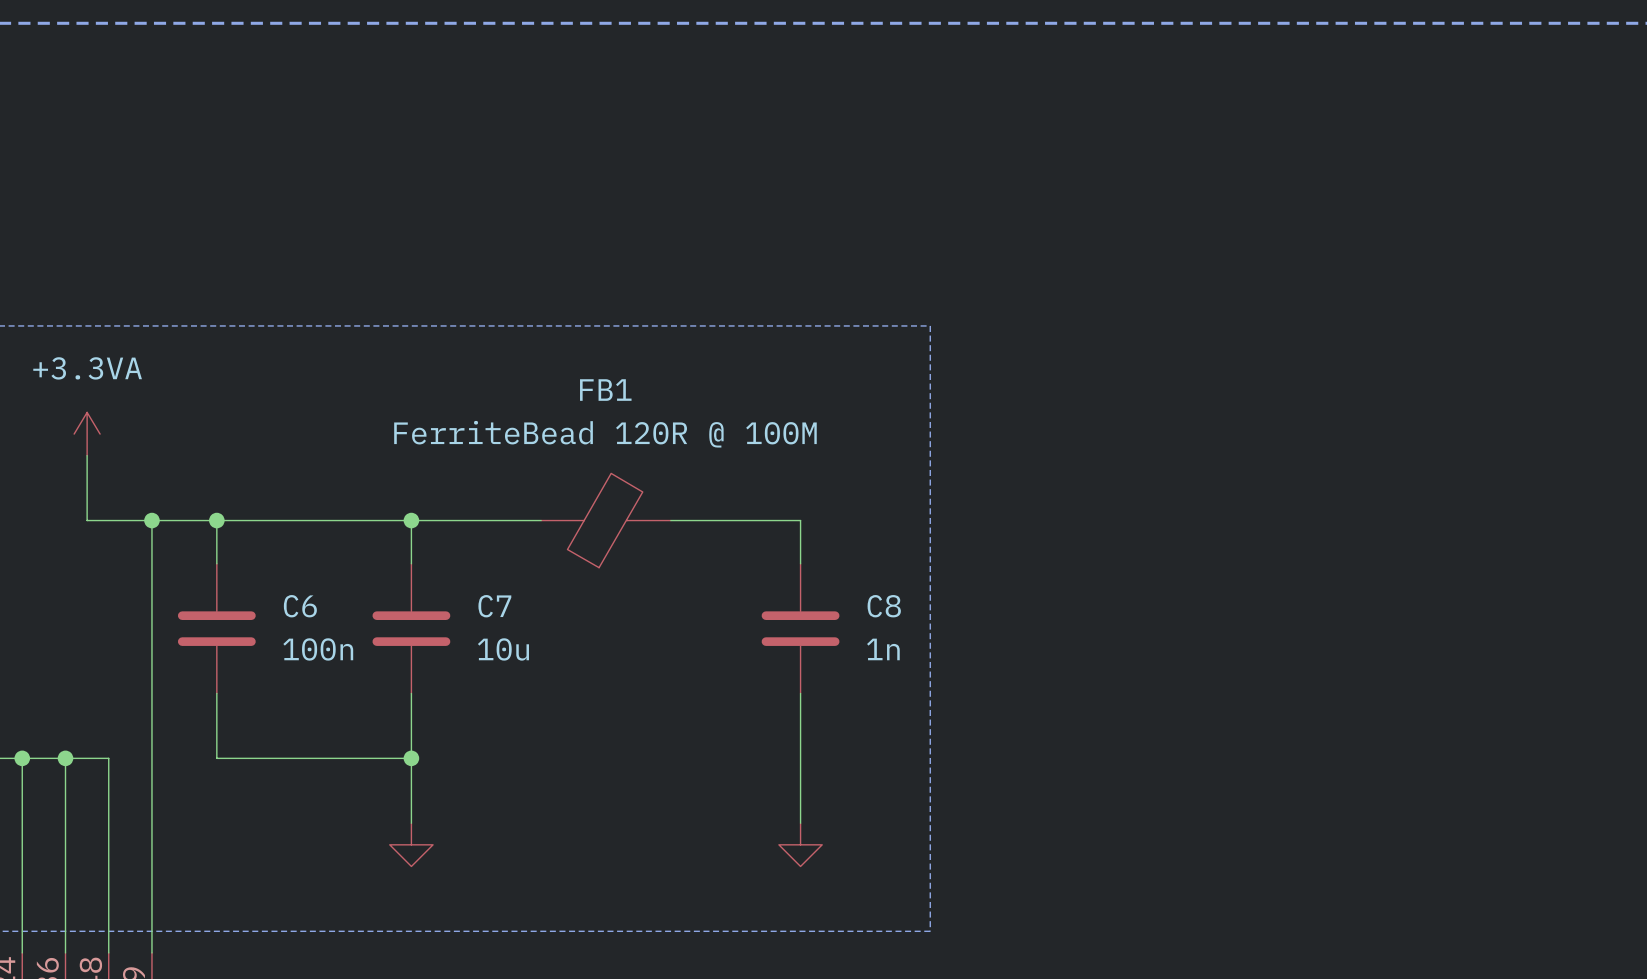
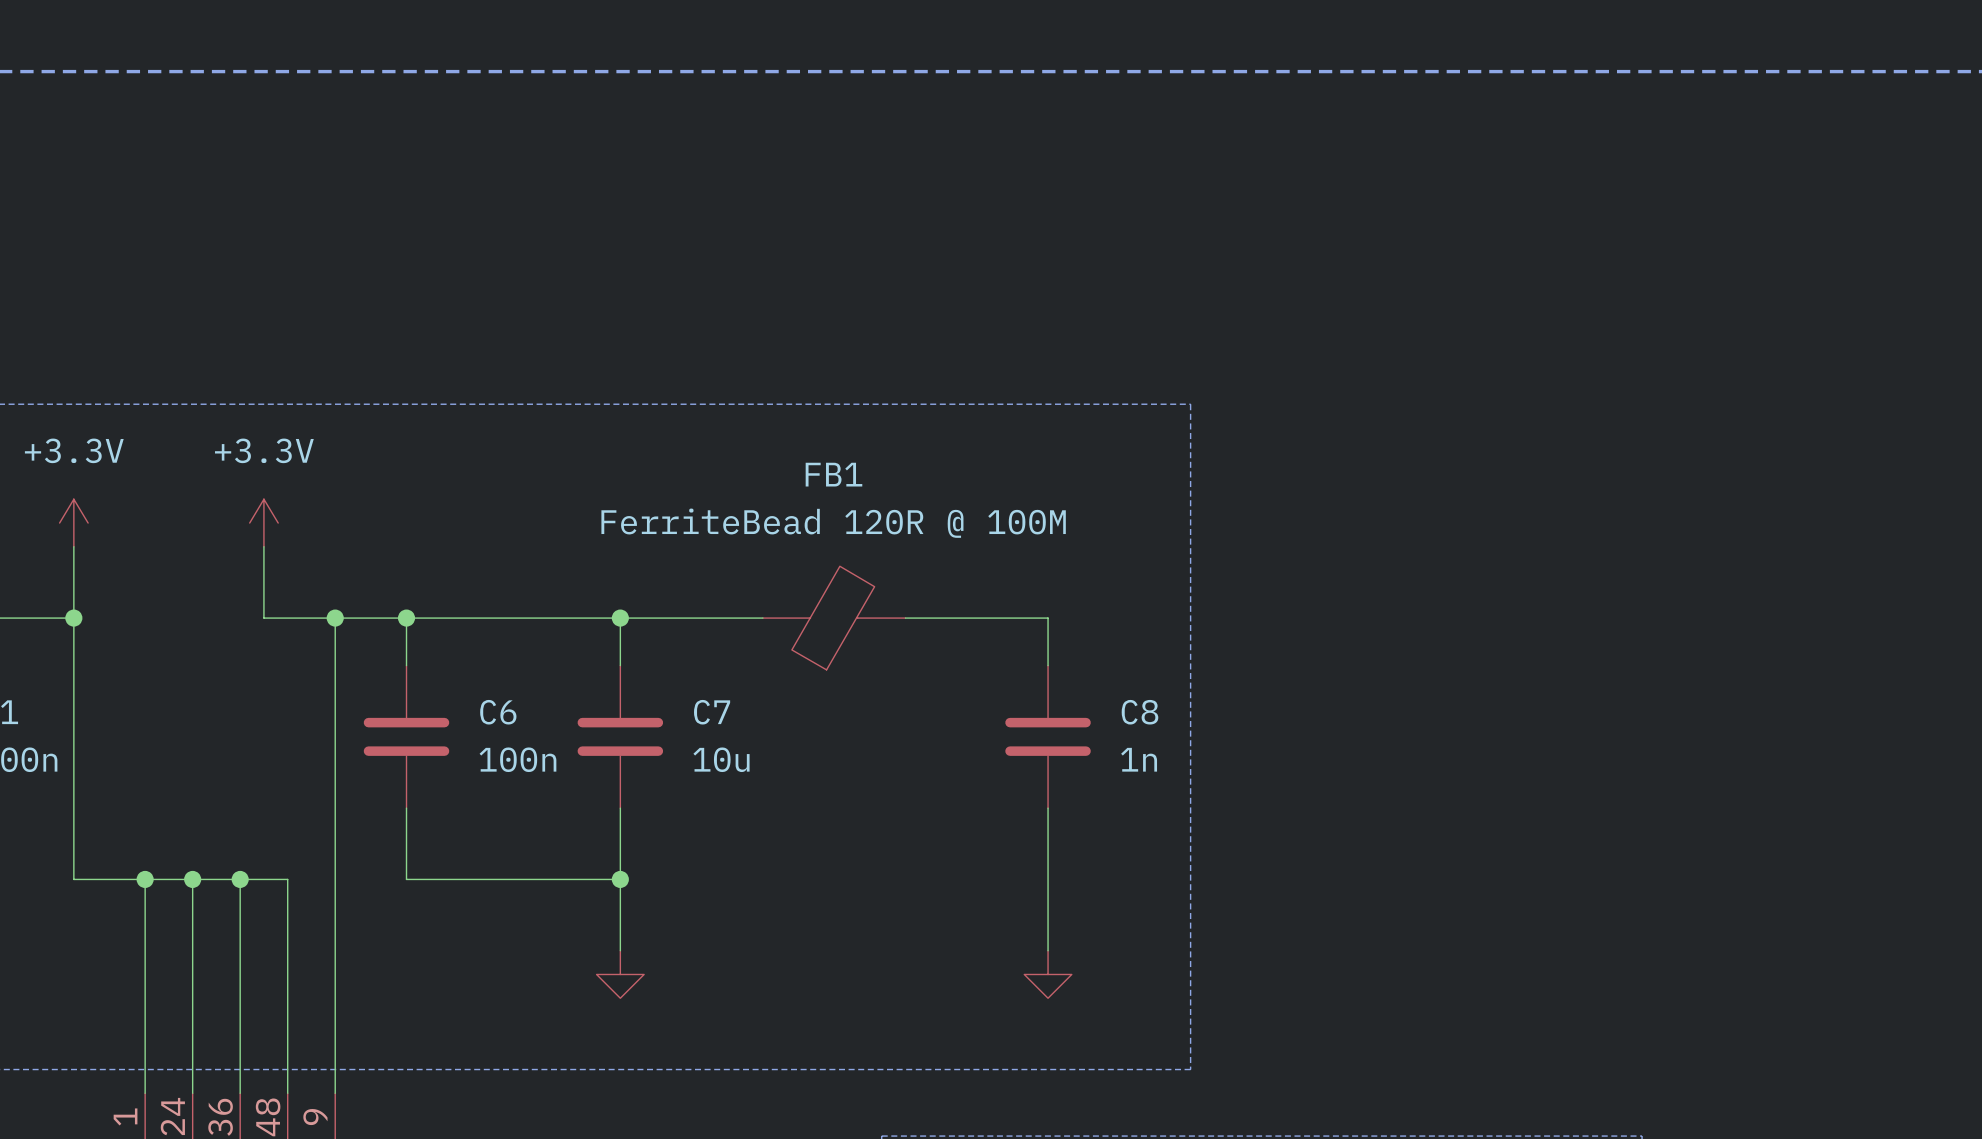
power symbol: +3.3VA (87, 434) -> +3.3V (263, 523)

